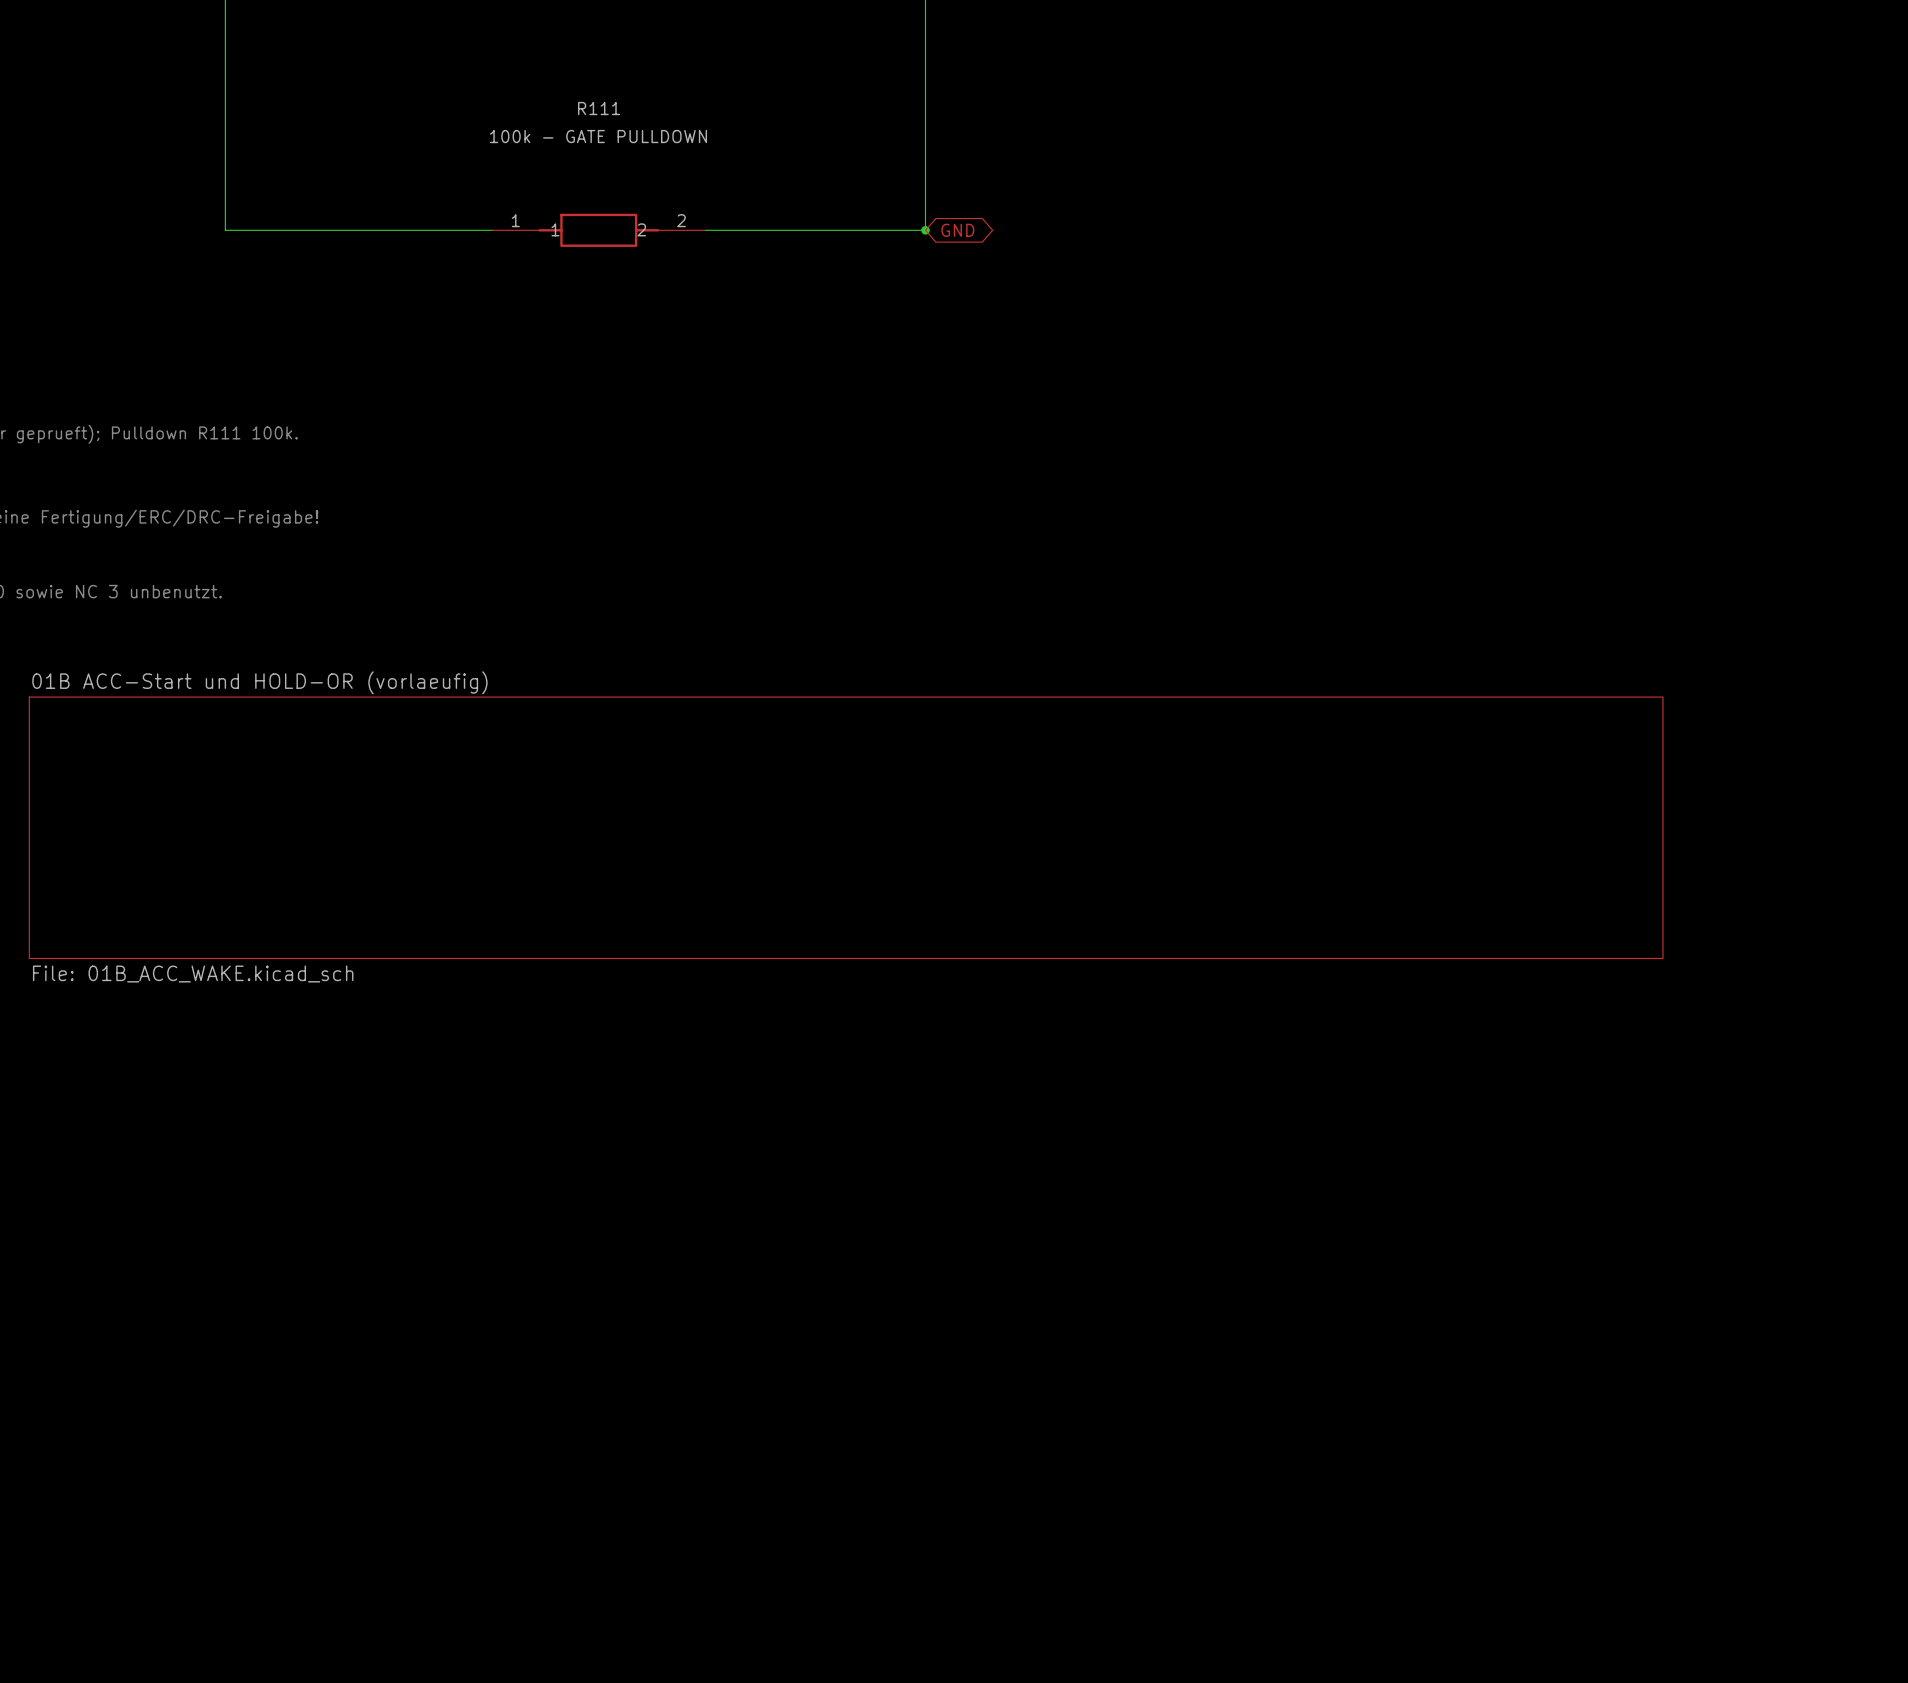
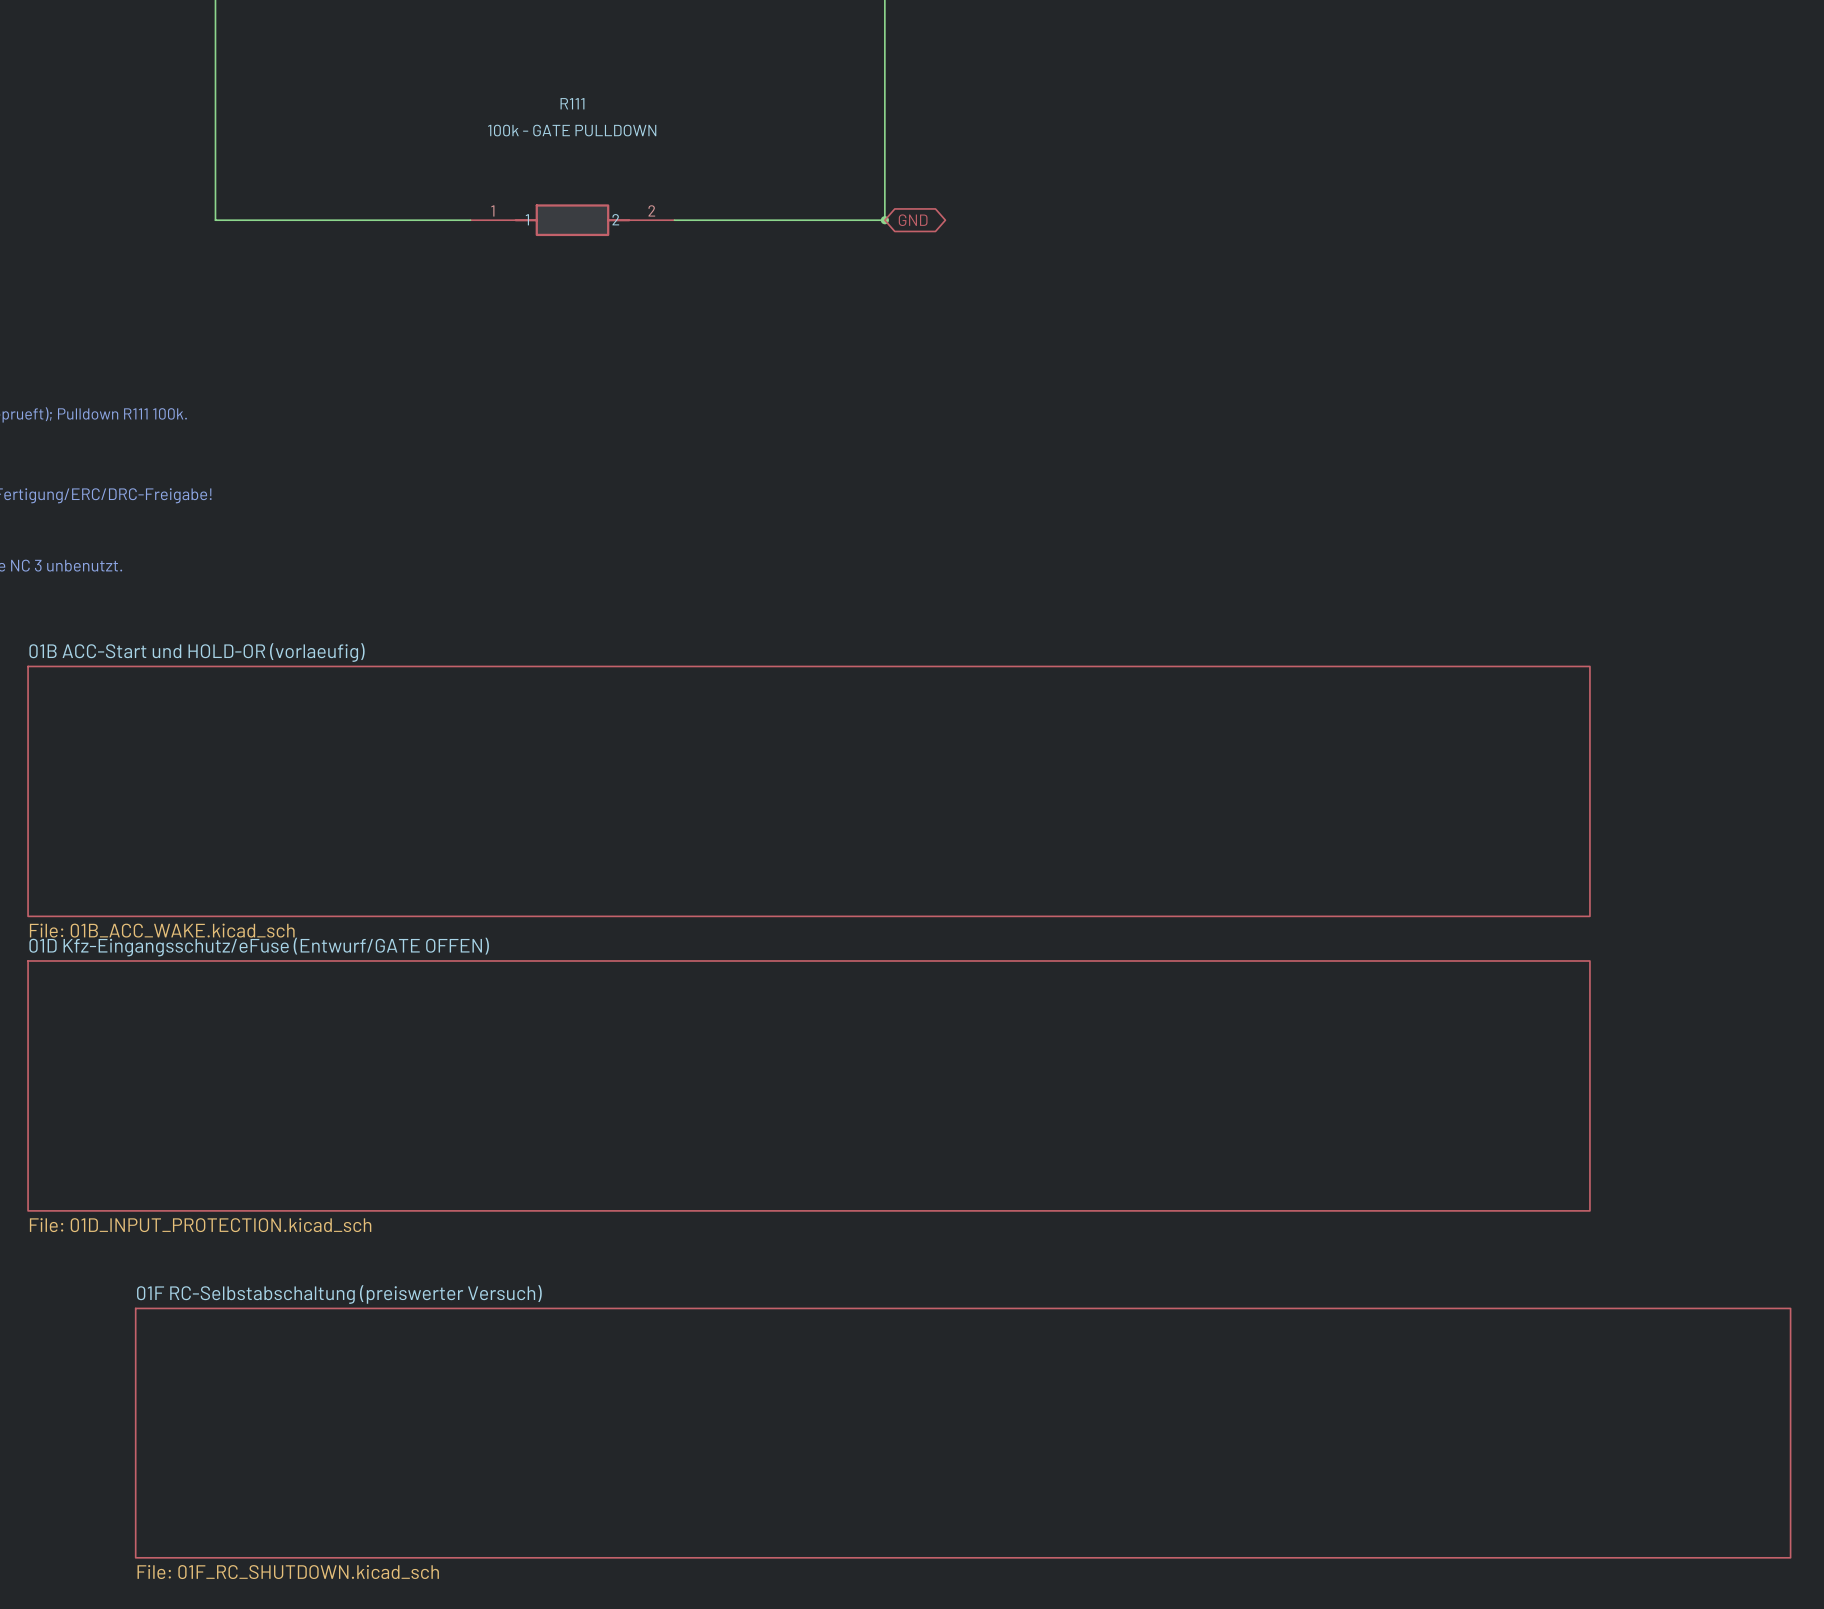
sheet 01D Kfz-Eingangsschutz/eFuse (Entwurf/GATE OFFEN): none -> File: 01D_INPUT_PROTECTION.kicad_sch (809, 1085)
sheet 01F RC-Selbstabschaltung (preiswerter Versuch): none -> File: 01F_RC_SHUTDOWN.kicad_sch (963, 1433)

